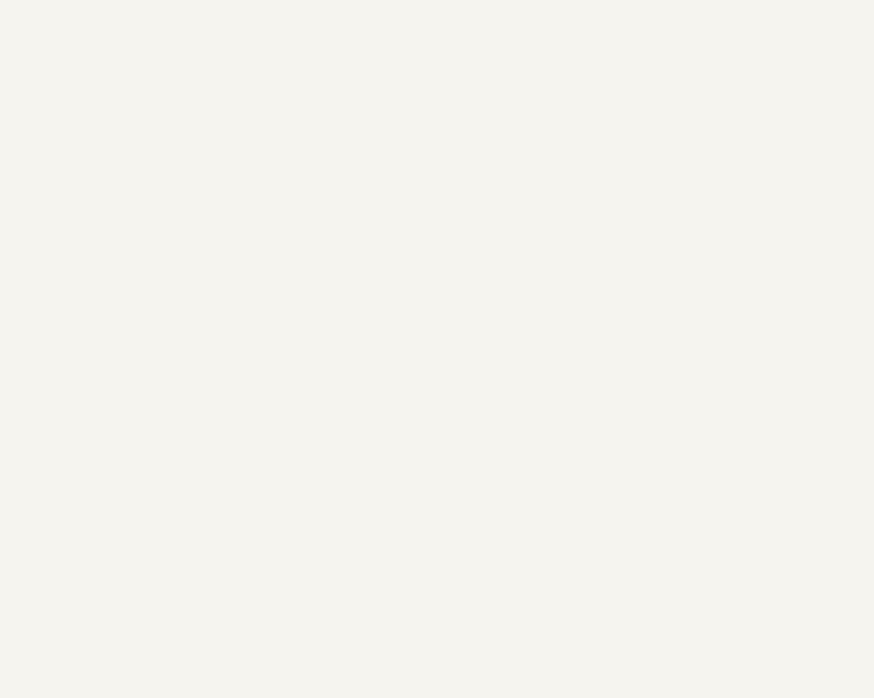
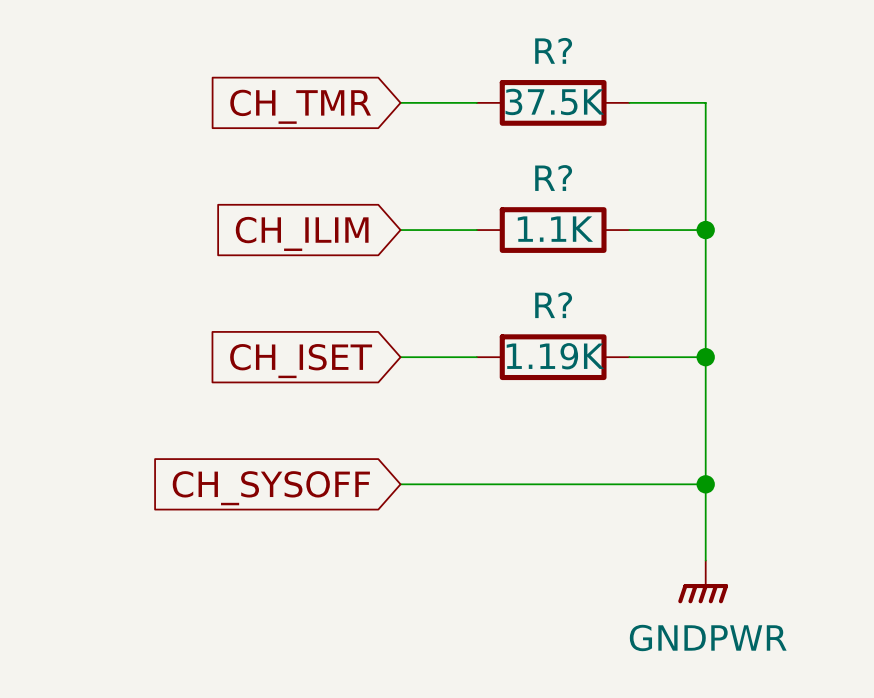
wire: none -> (400, 102) (476, 102)
R?: none -> 37.5K (553, 102)
wire: none -> (629, 102) (705, 102) (705, 560)
global label: none -> CH_TMR (300, 106)
wire: none -> (400, 230) (476, 230)
R?: none -> 1.1K (553, 230)
wire: none -> (629, 230) (705, 230)
junction: none -> (705, 230)
global label: none -> CH_ILIM (302, 233)
wire: none -> (400, 357) (476, 357)
R?: none -> 1.19K (553, 357)
wire: none -> (629, 357) (705, 357)
junction: none -> (705, 357)
global label: none -> CH_ISET (301, 361)
wire: none -> (400, 484) (705, 484)
junction: none -> (705, 484)
global label: none -> CH_SYSOFF (271, 488)
power symbol: none -> GNDPWR (703, 581)

